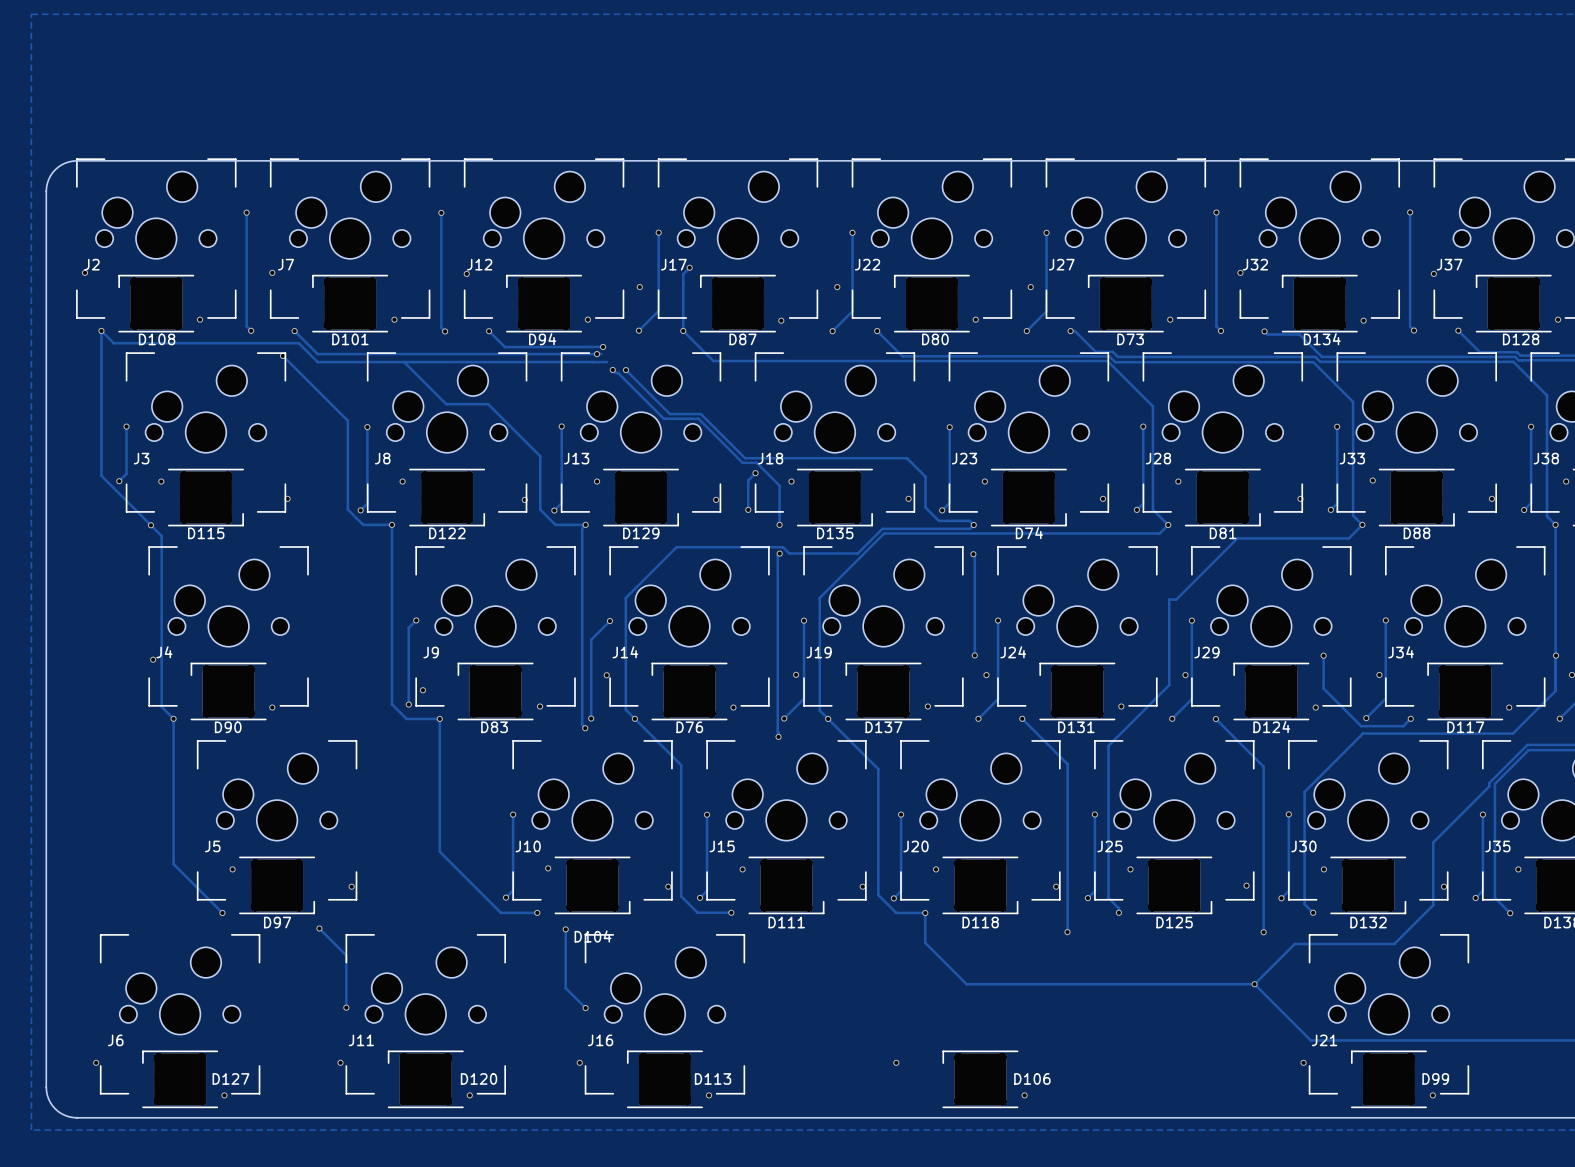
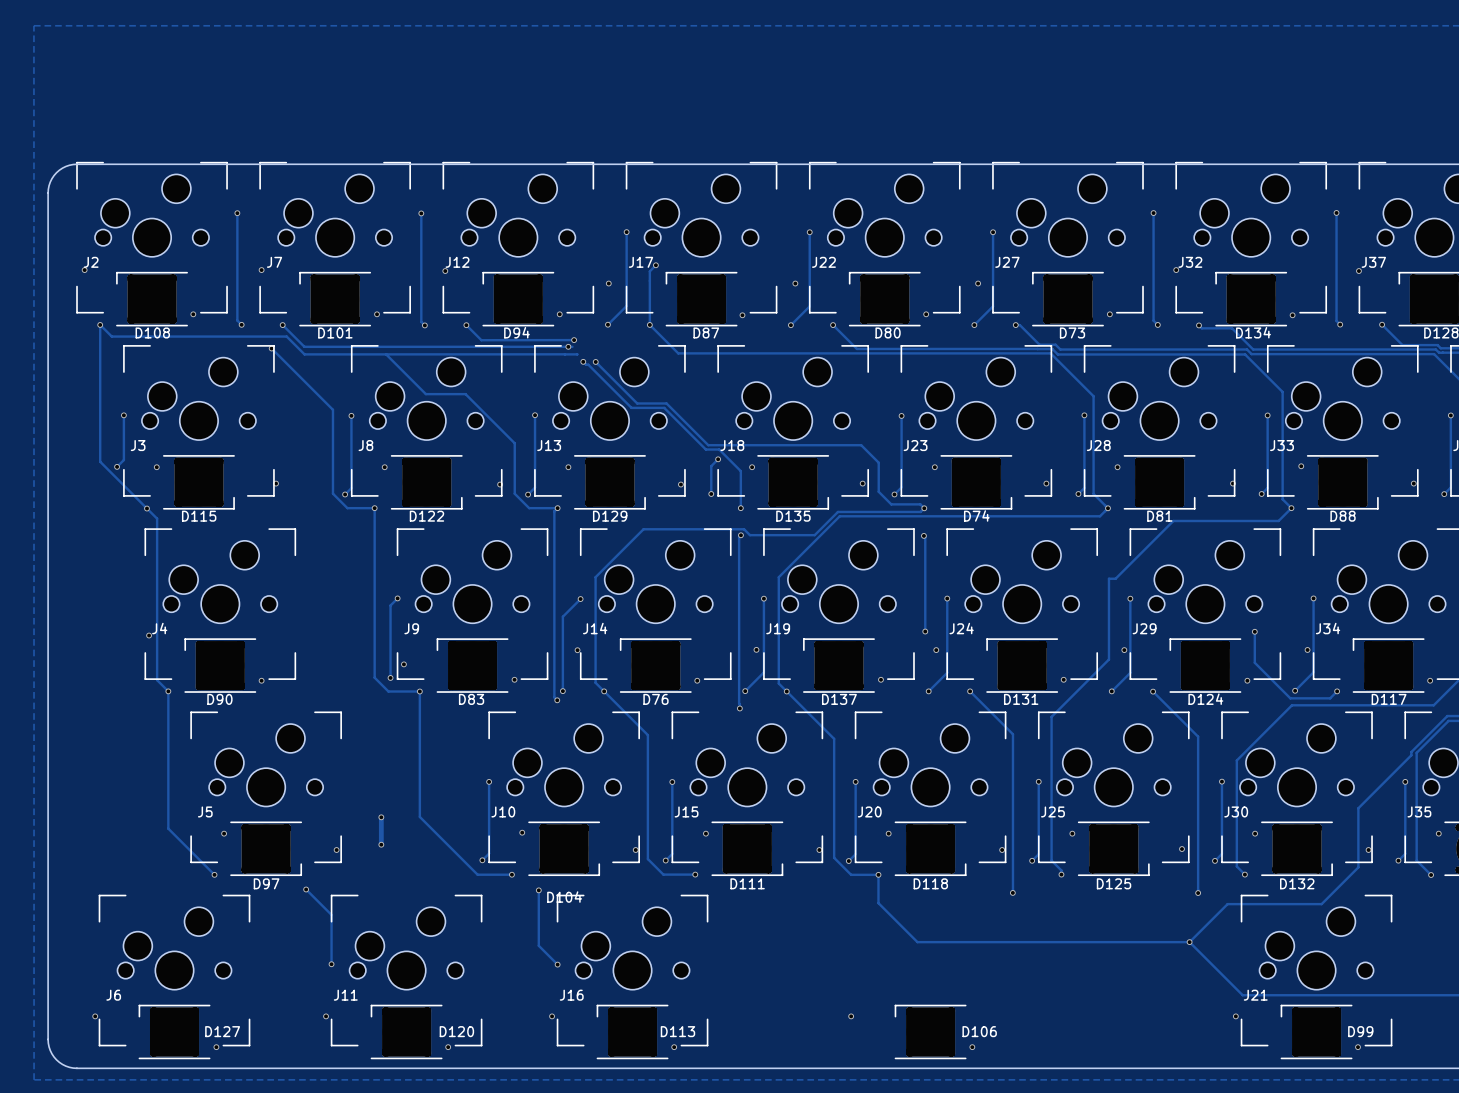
track: none -> (381, 817) (381, 844)
via: none -> (381, 817)
via: none -> (381, 844)

